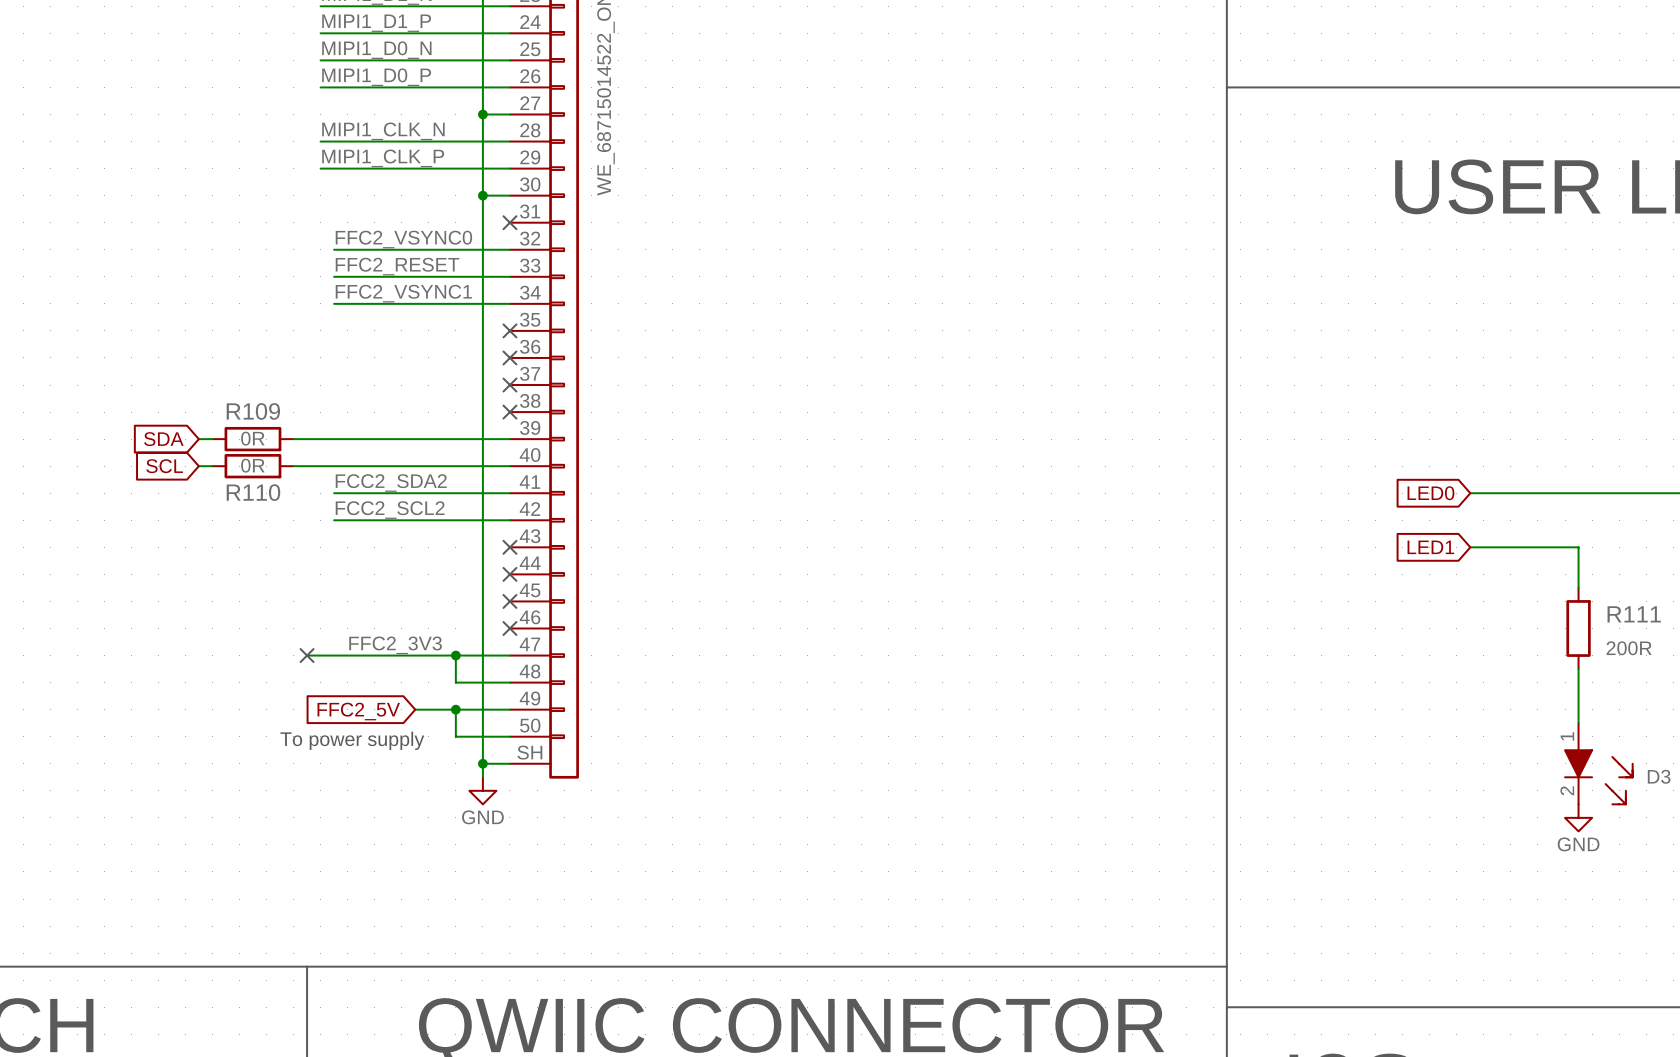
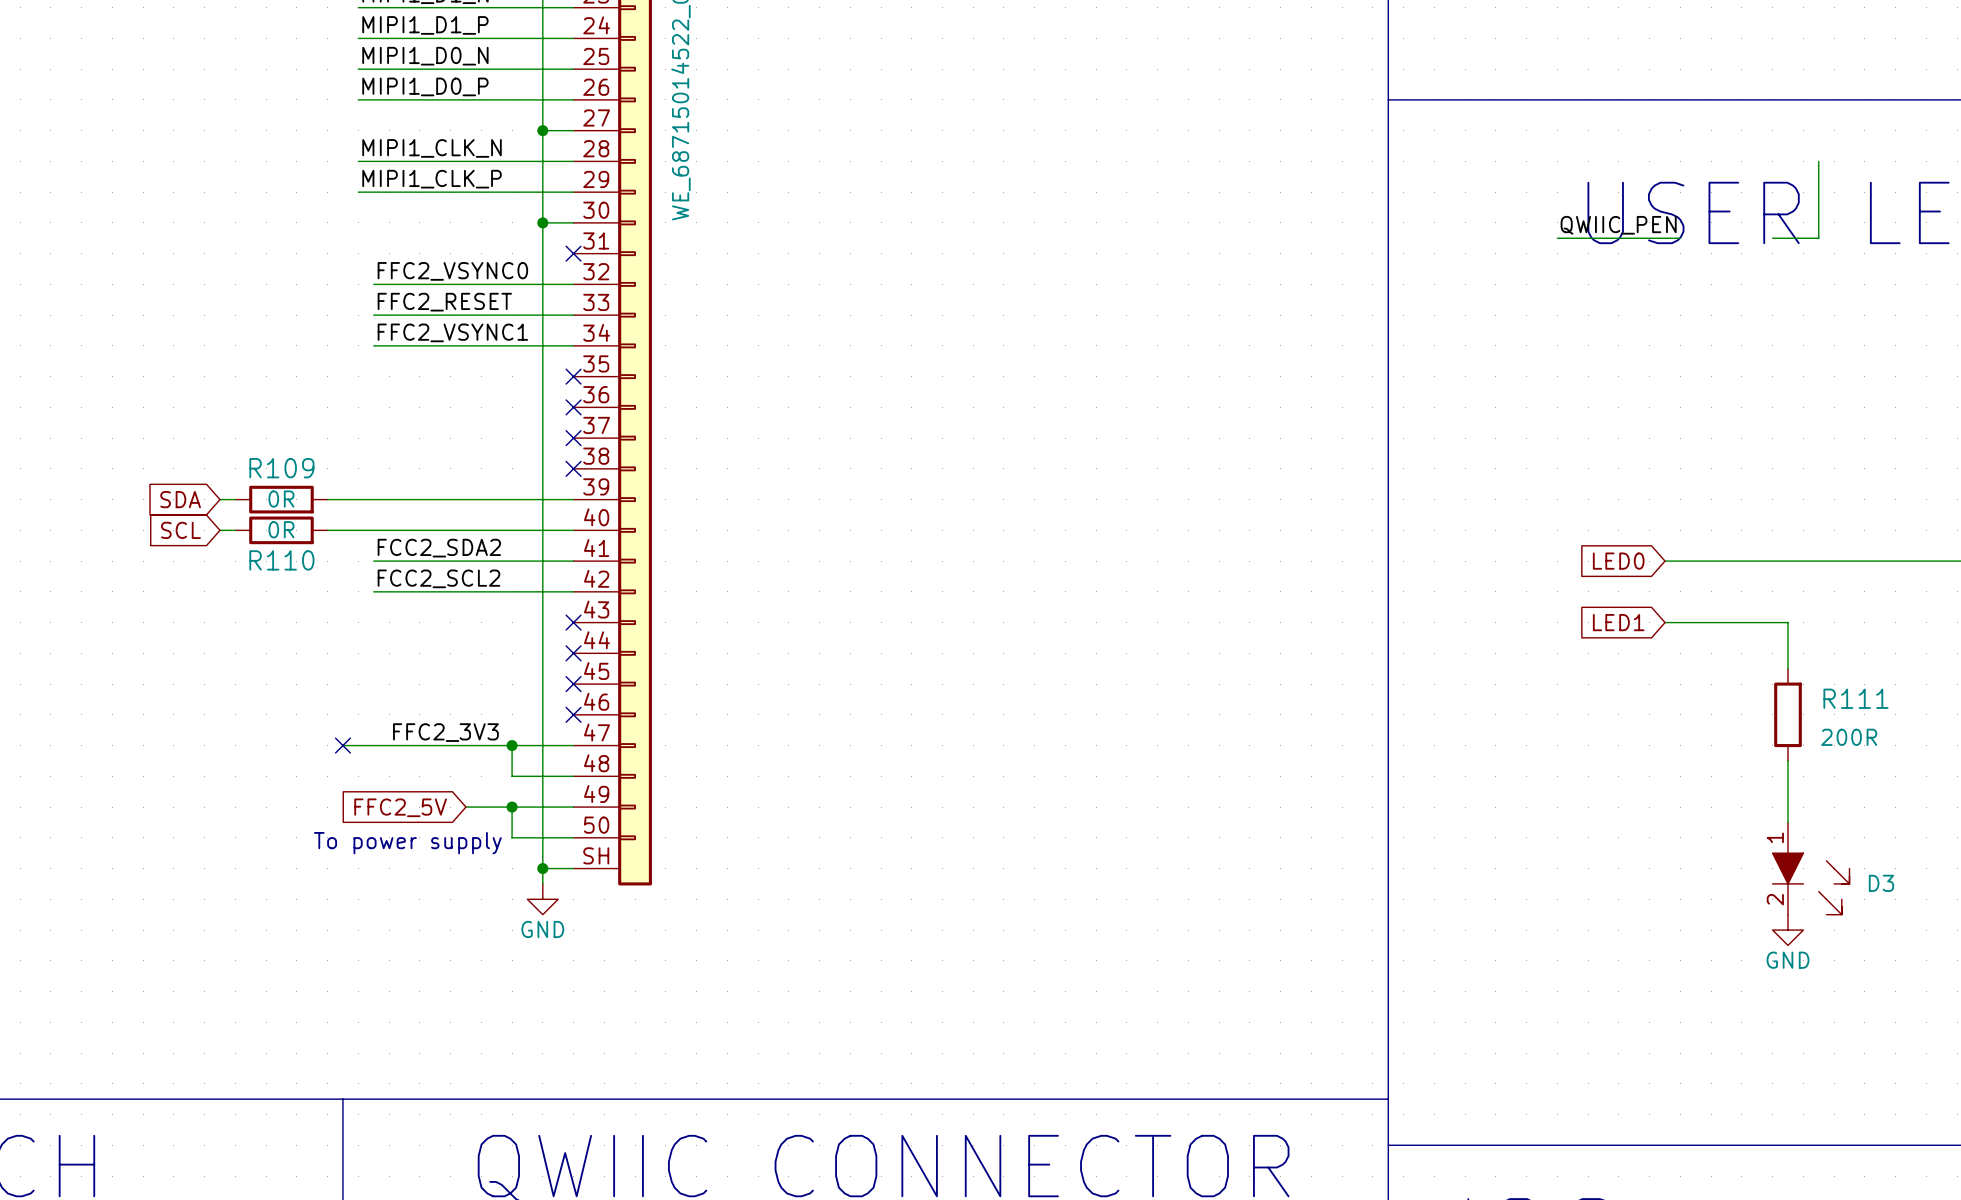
wire: none -> (1818, 161) (1818, 238) (1772, 238)
label: none -> QWIIC_PEN (1618, 225)
wire: none -> (1557, 238) (1680, 238)

